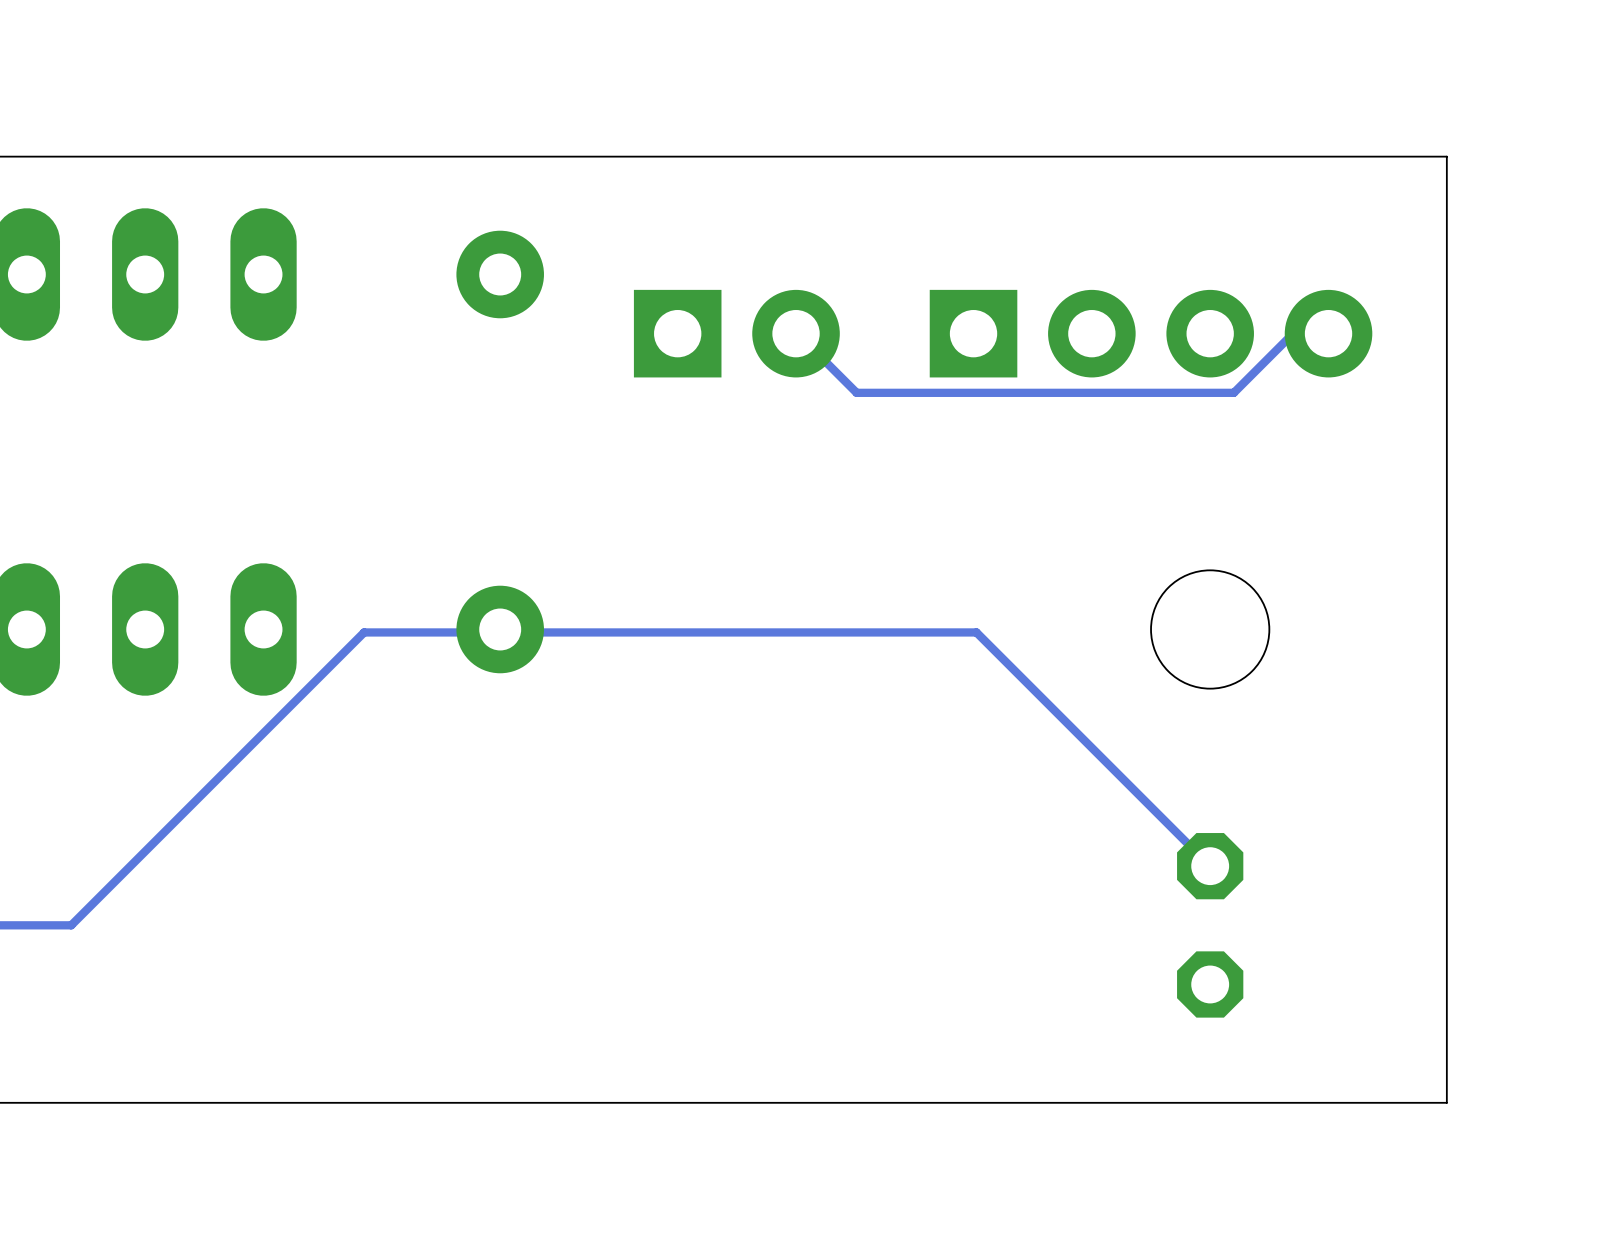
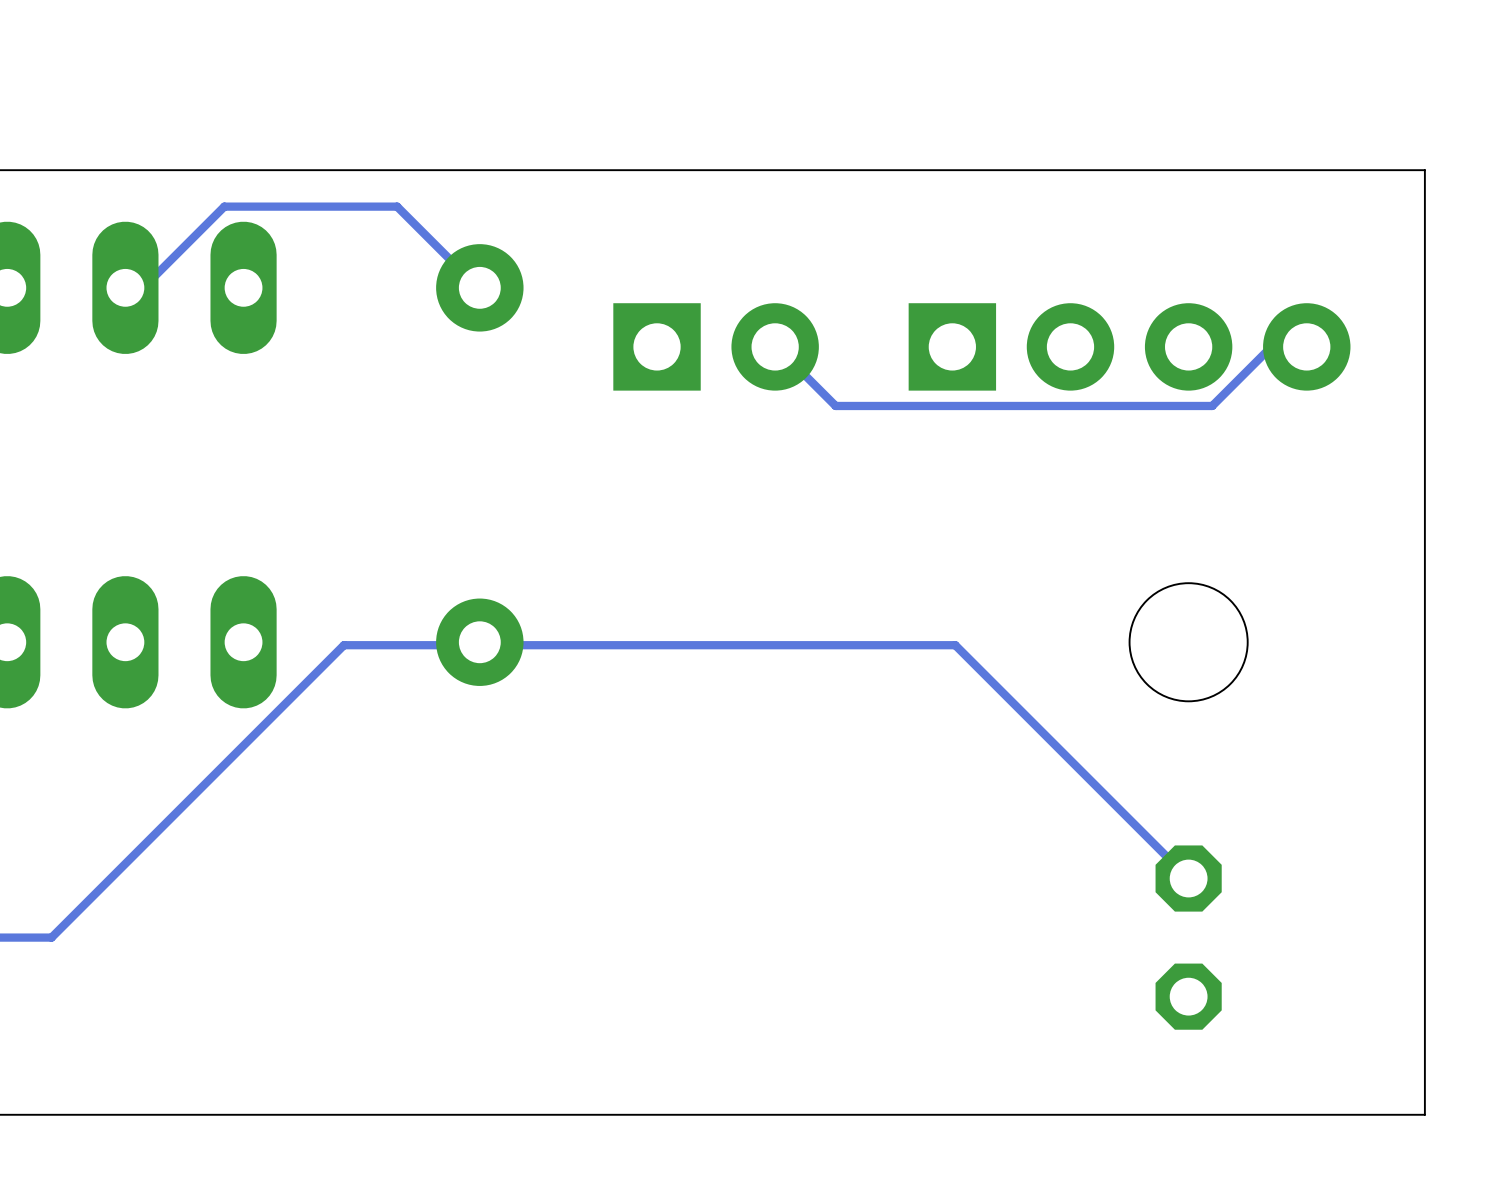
track: none -> (479, 287) (397, 206) (224, 206) (144, 286) (125, 287)

